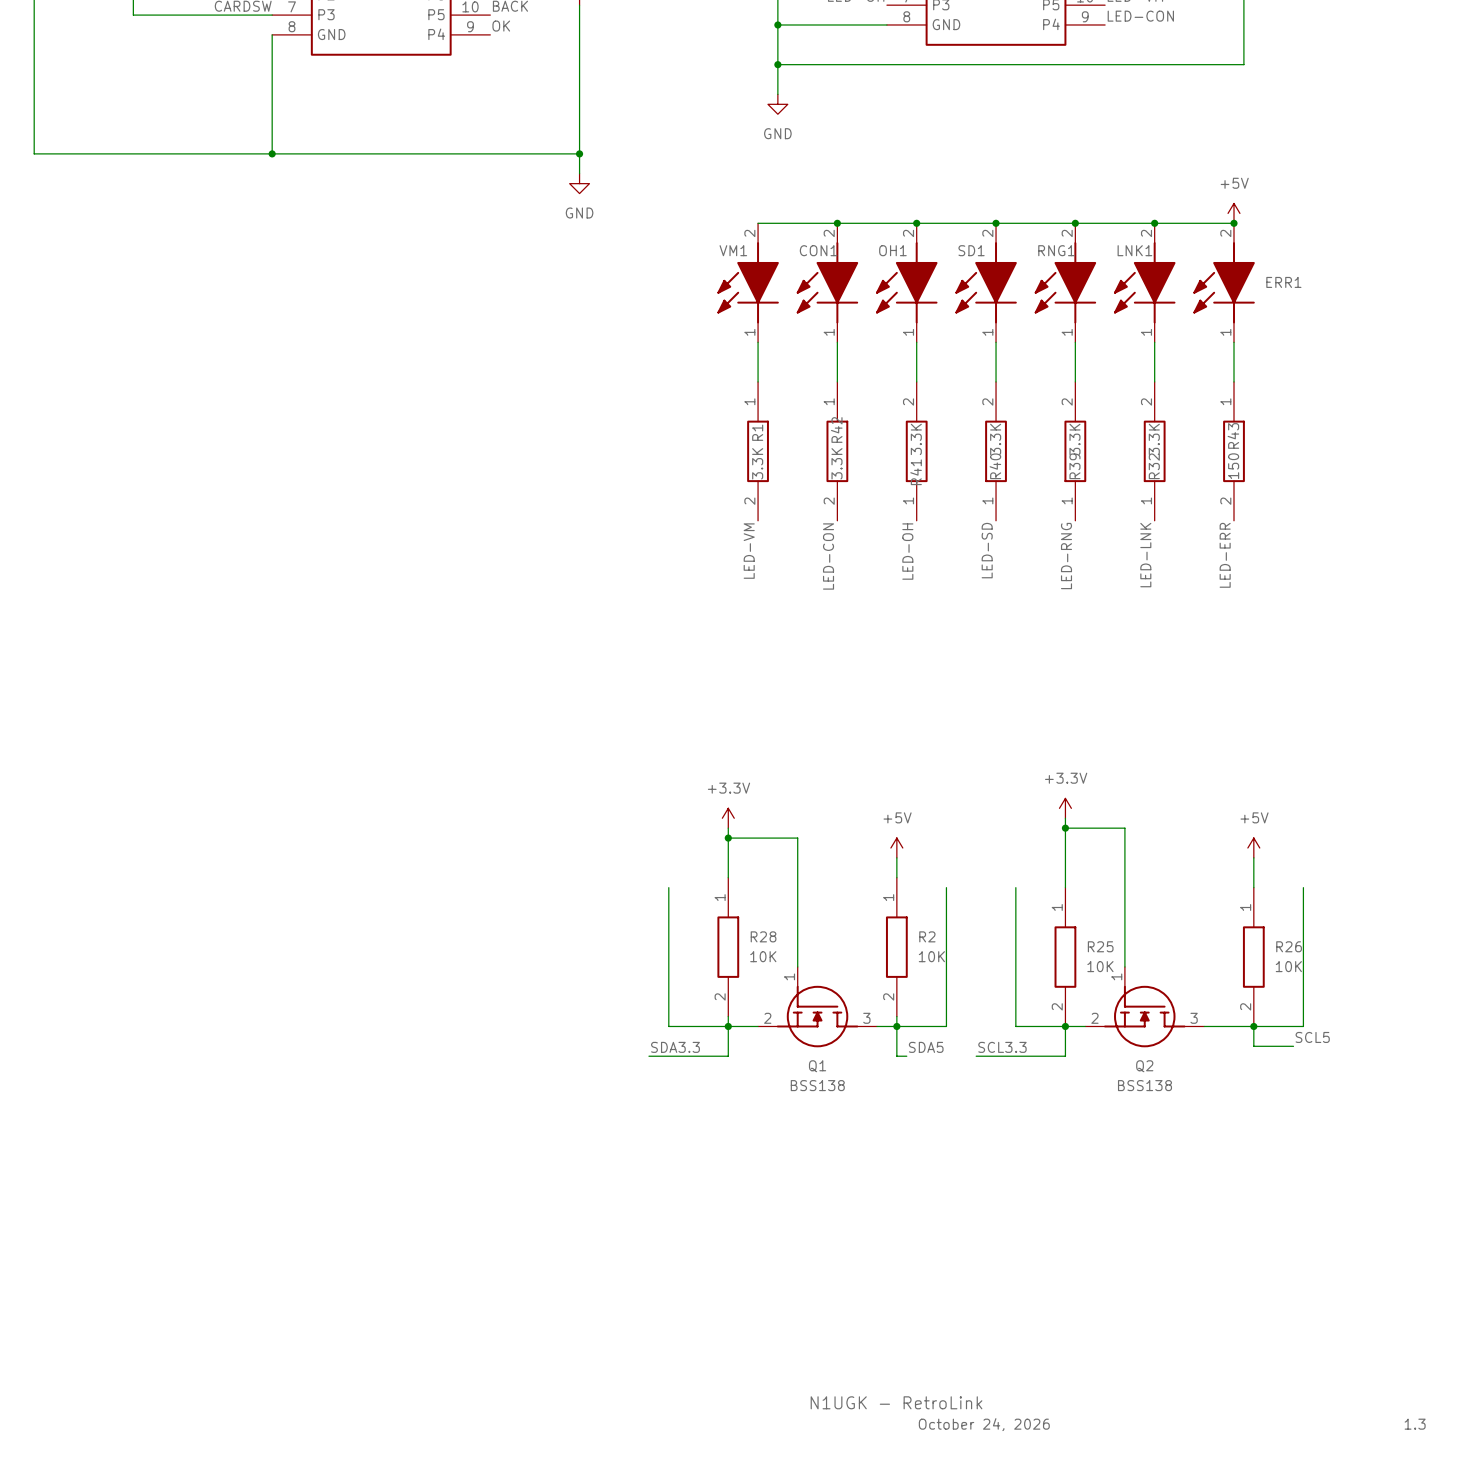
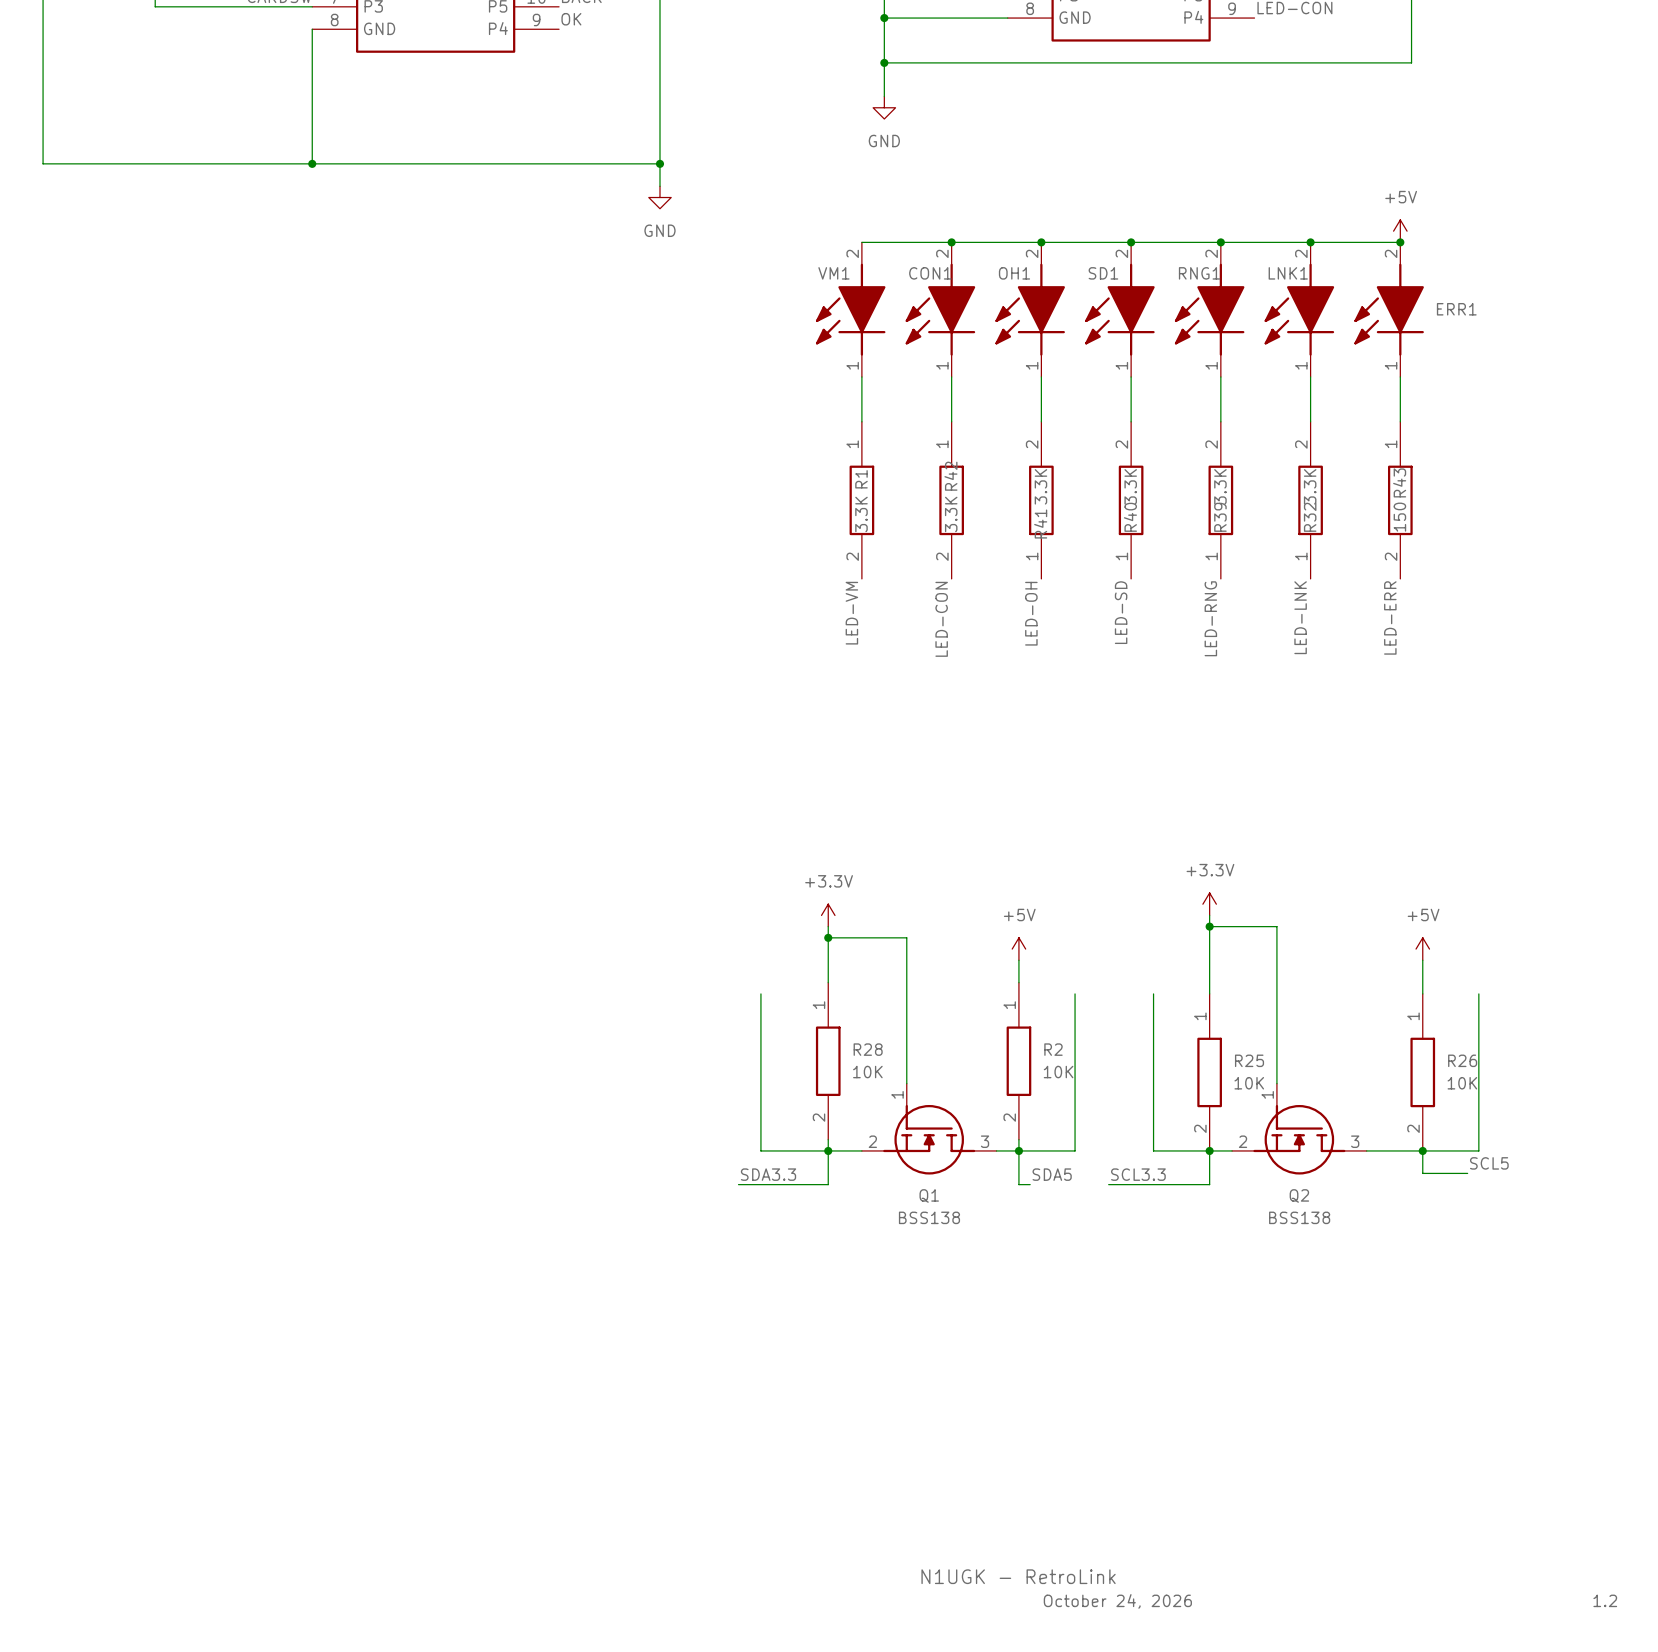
label: 1.3 (1415, 1424) -> 1.2 (1605, 1600)

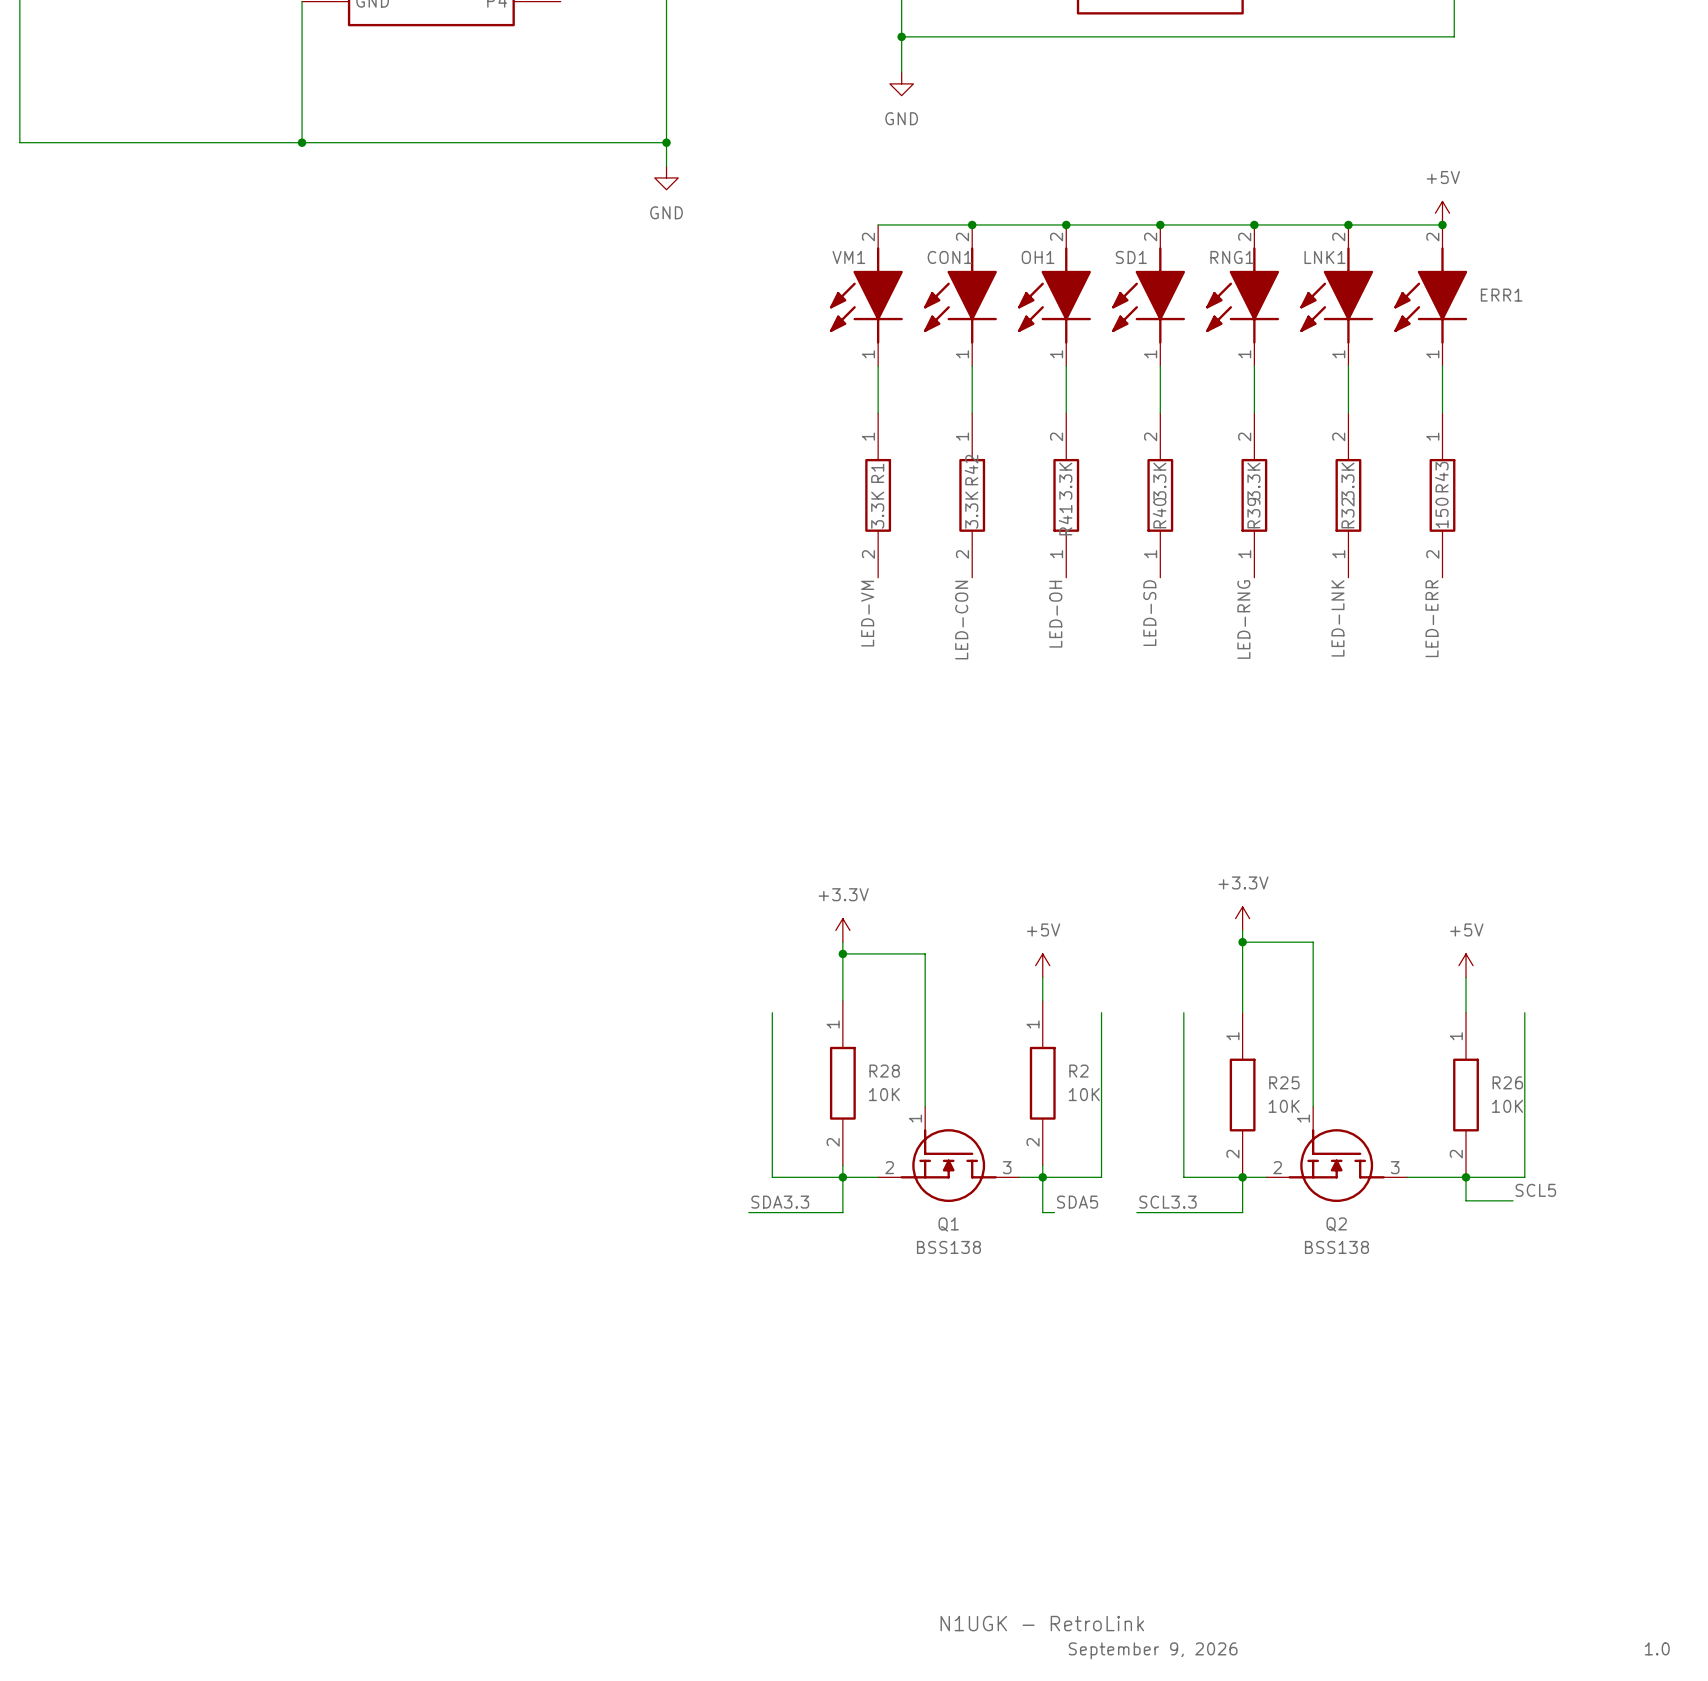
label: 1.2 (1605, 1600) -> 1.0 (1657, 1648)
label: October 24, 2026 (1117, 1601) -> September 9, 2026 (1153, 1650)

